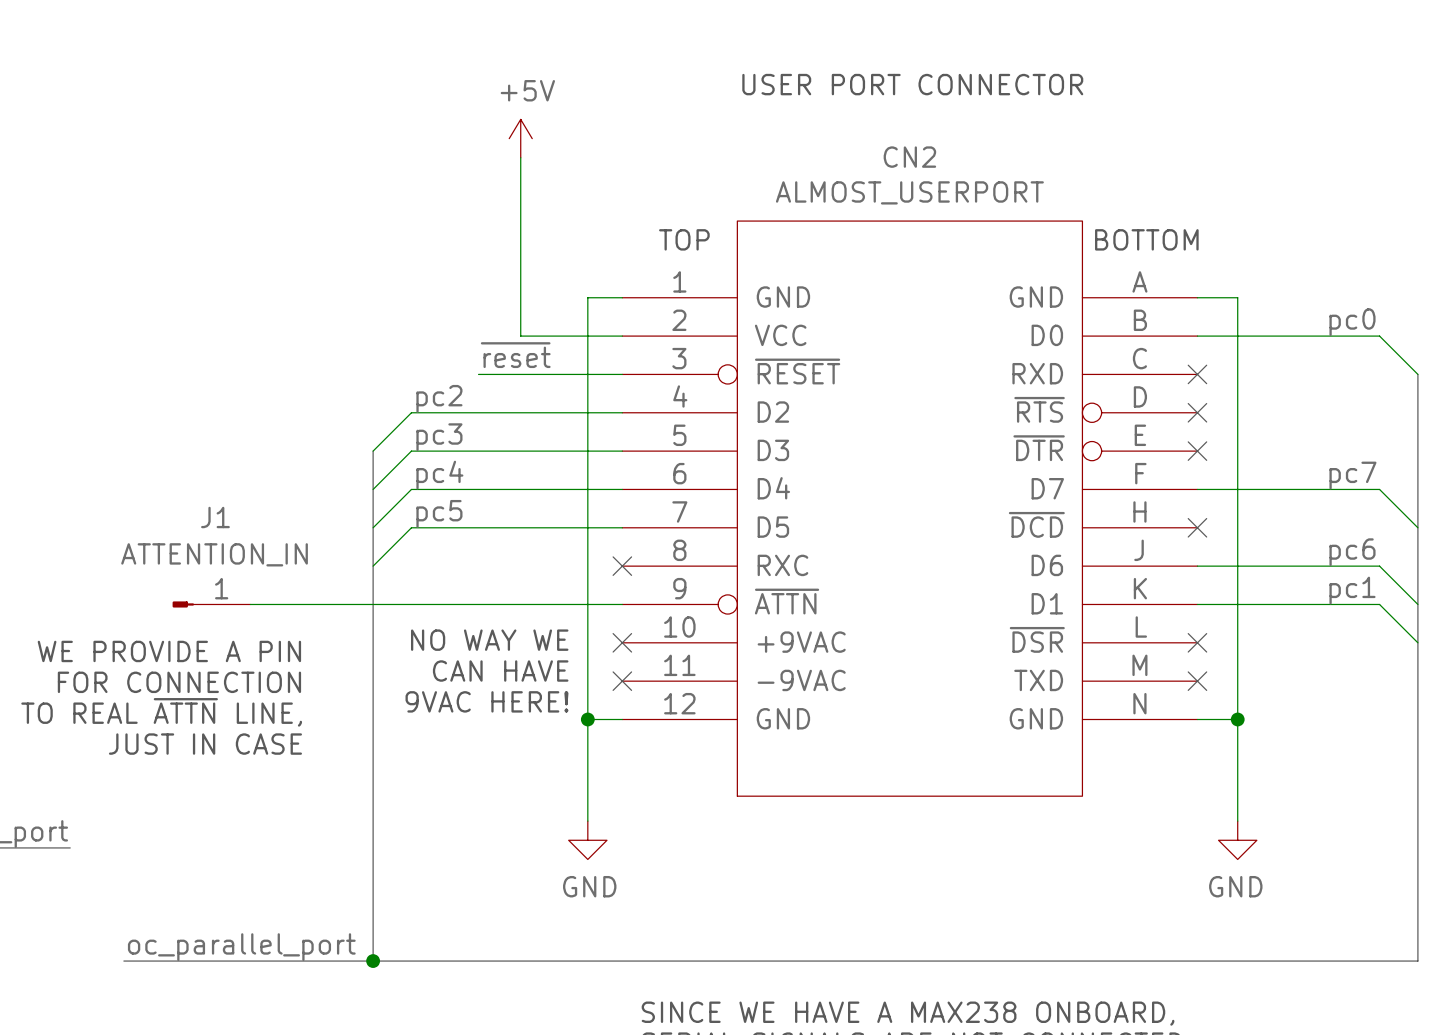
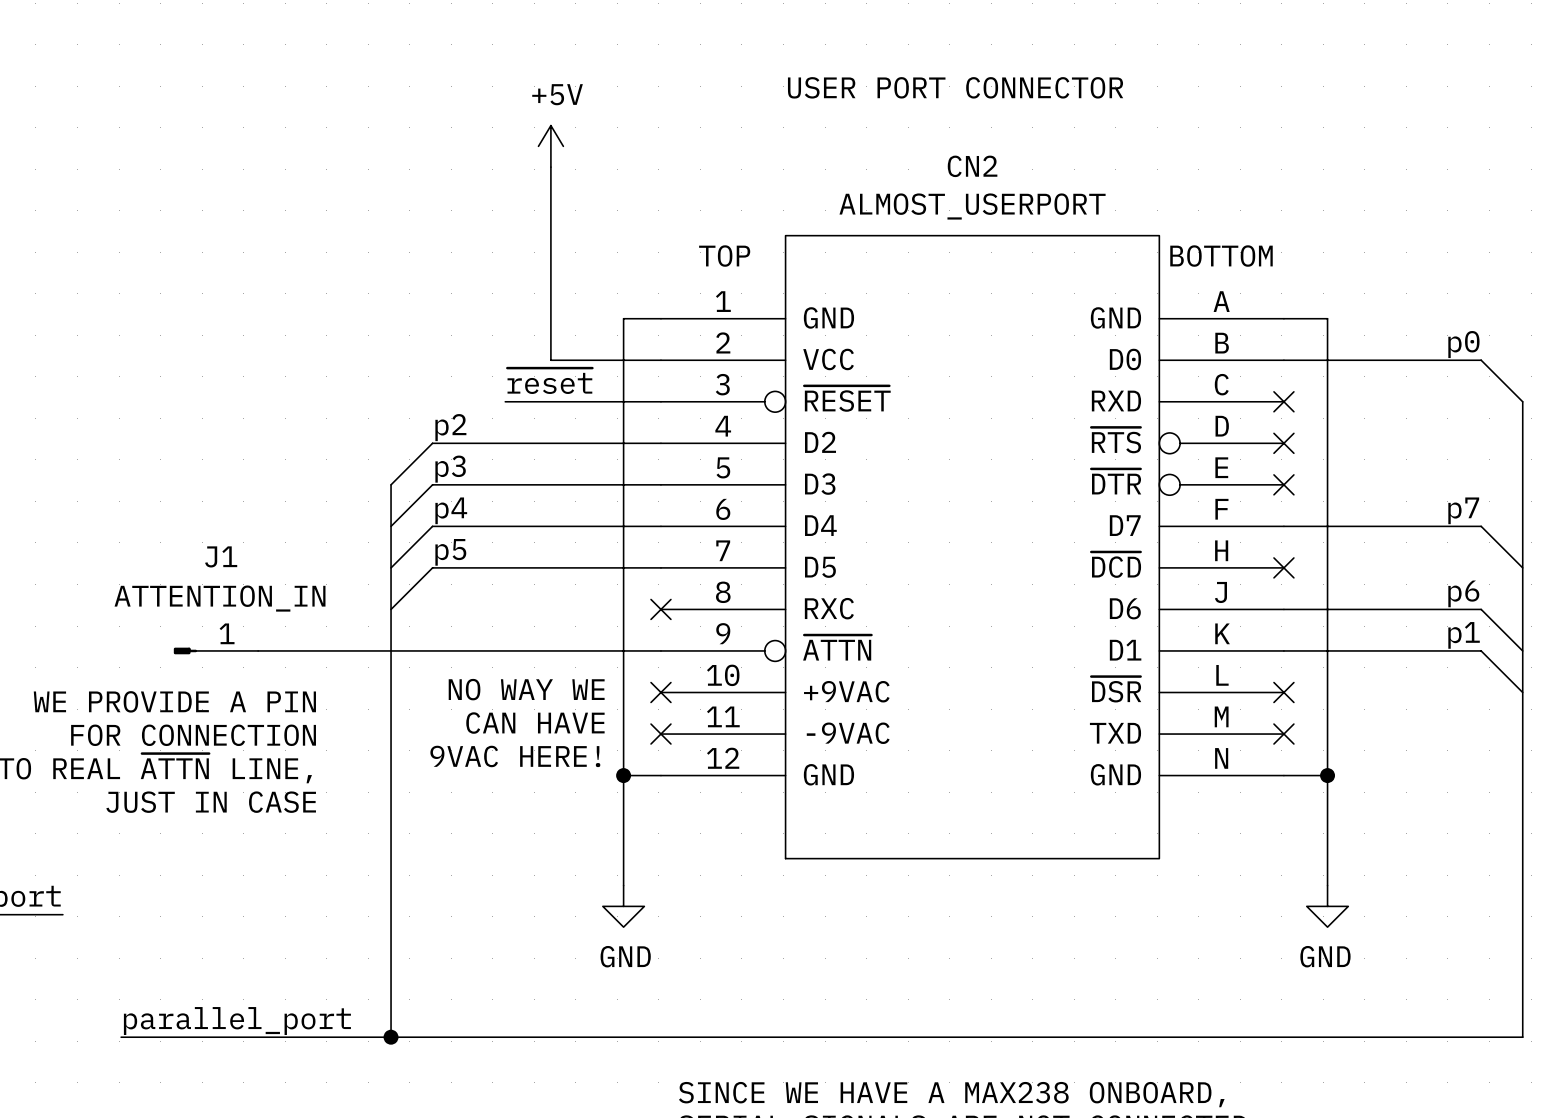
label: pc0 (1352, 322) -> p0 (1463, 344)
label: pc2 (439, 398) -> p2 (450, 427)
label: pc3 (439, 437) -> p3 (450, 469)
label: pc4 (439, 475) -> p4 (451, 510)
label: pc7 (1352, 475) -> p7 (1463, 510)
label: pc5 (439, 513) -> p5 (450, 552)
label: pc6 (1352, 552) -> p6 (1463, 593)
label: pc1 (1352, 590) -> p1 (1464, 635)
label: oc_parallel_port (241, 947) -> parallel_port (237, 1021)

